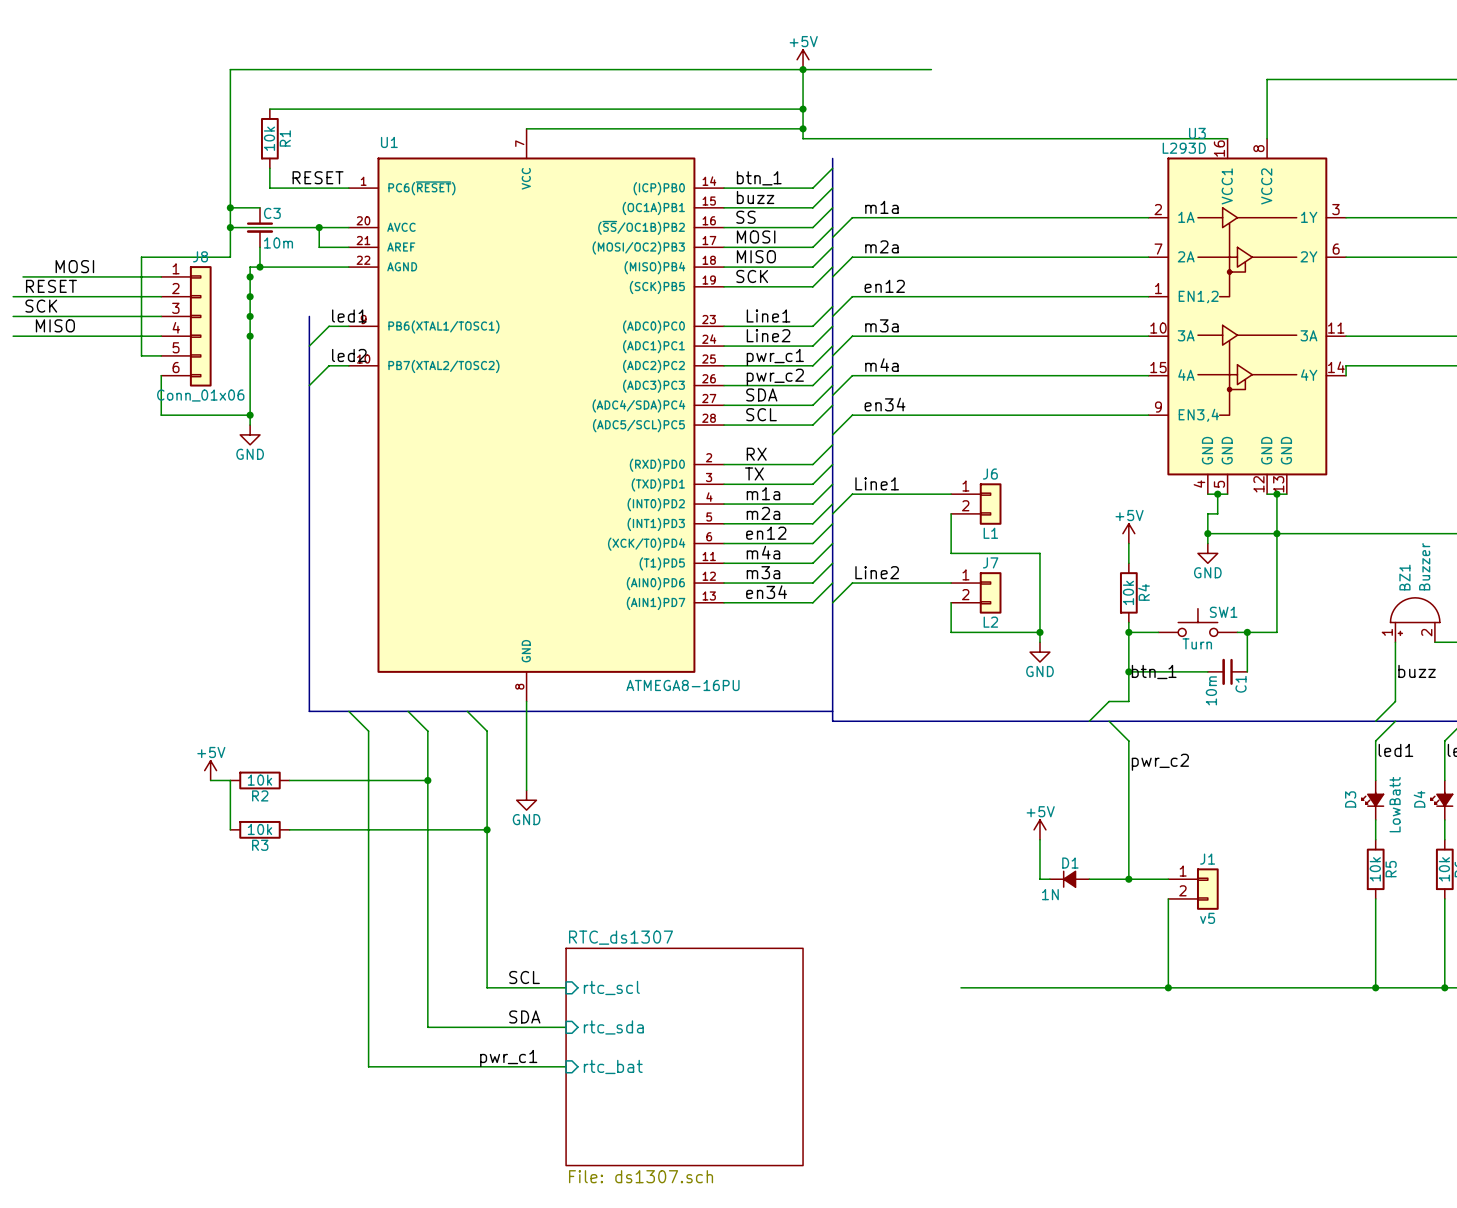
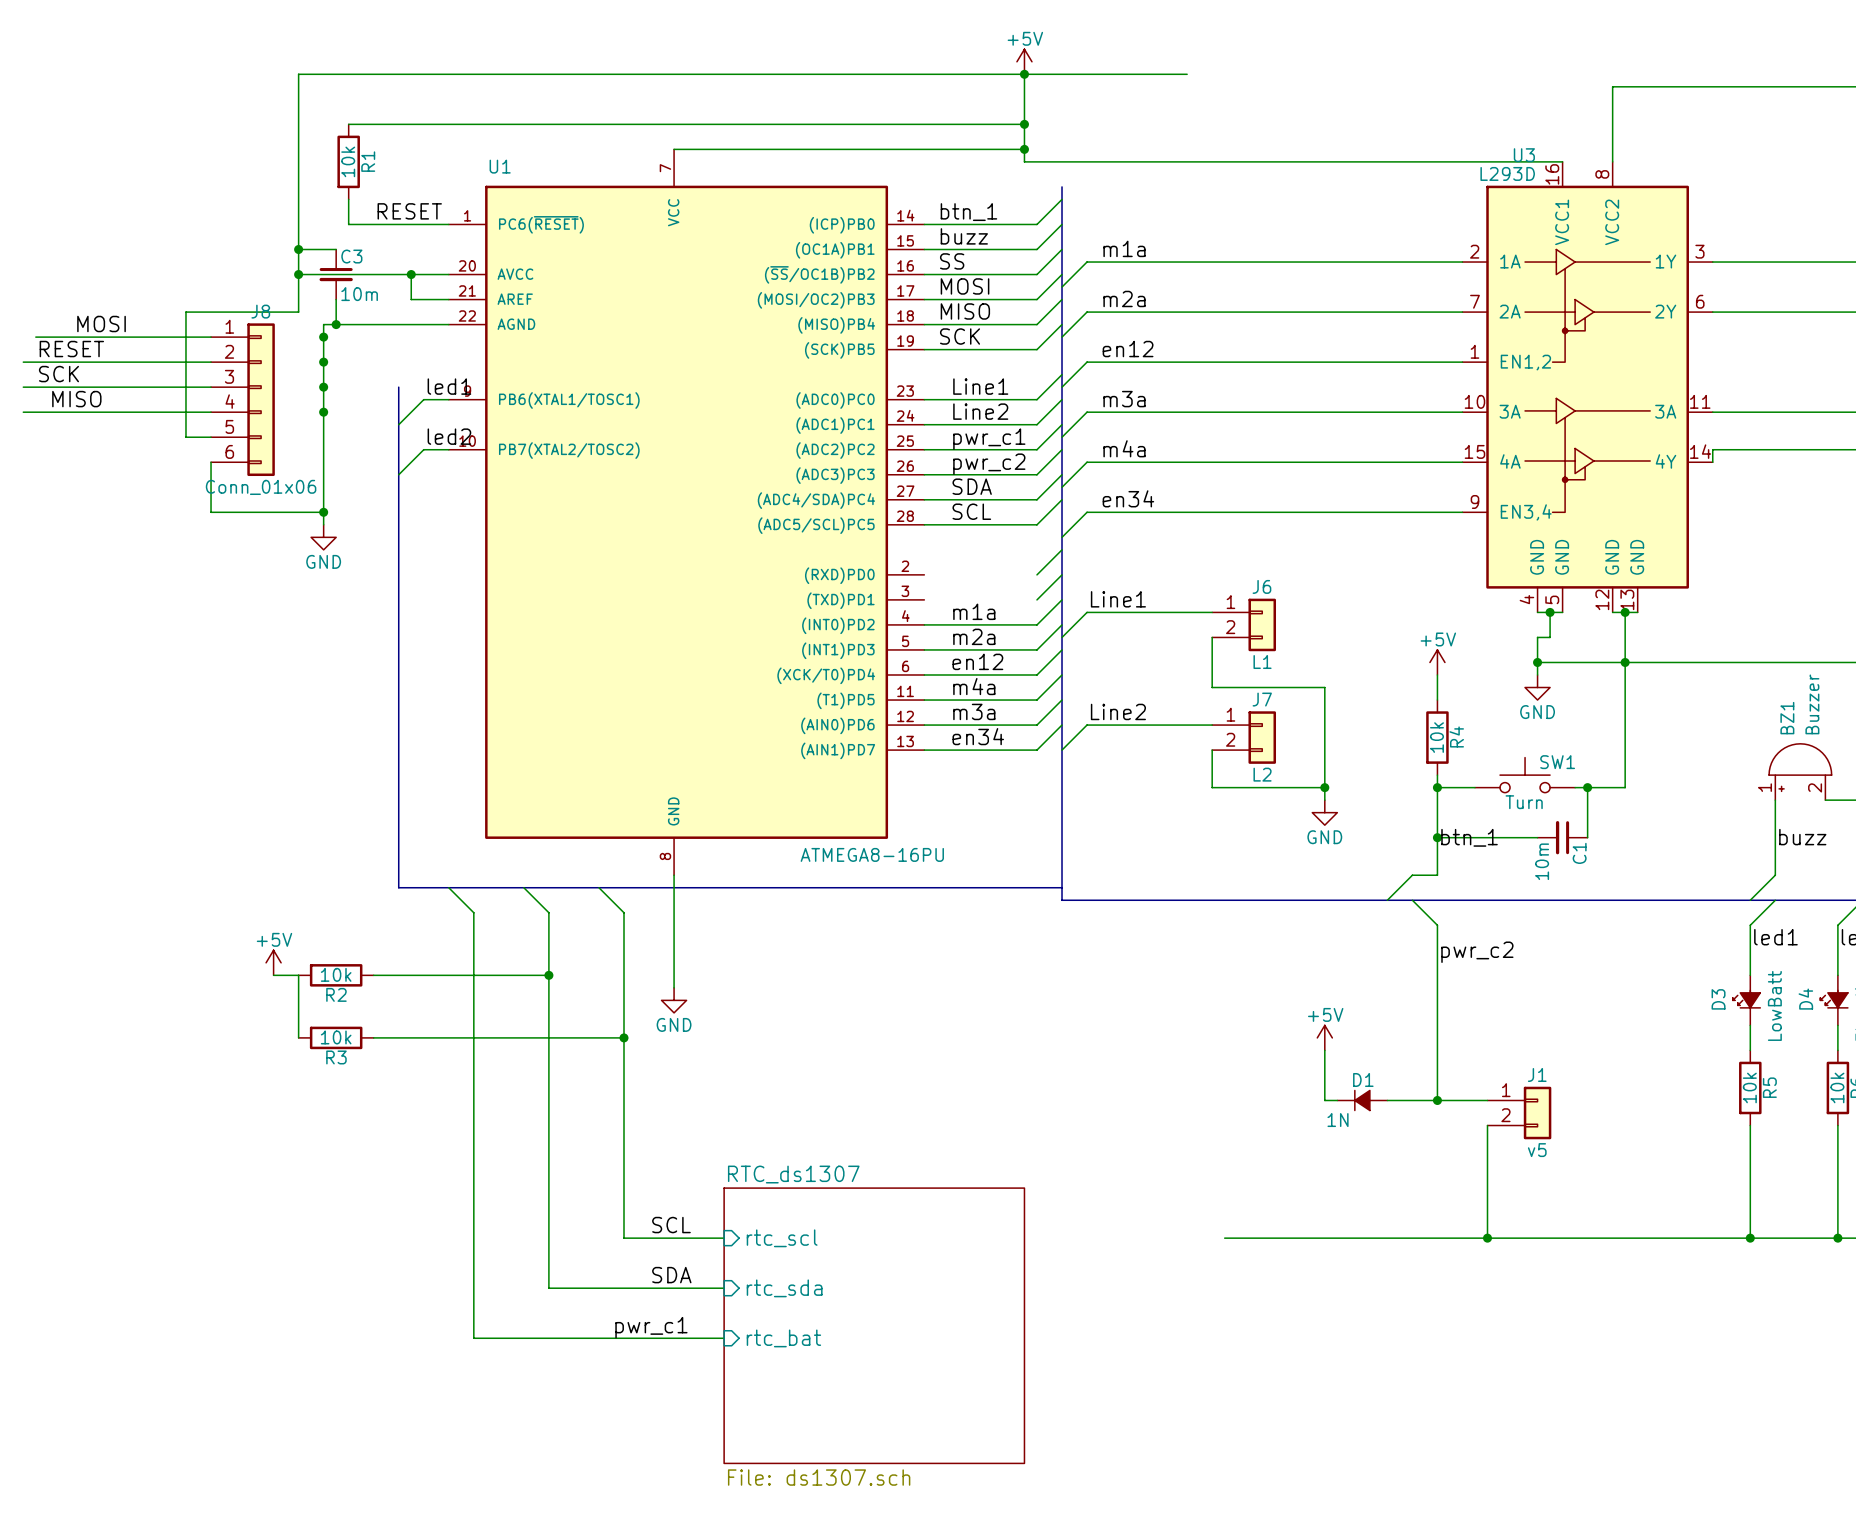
label: RX (756, 454) -> none
wire: (724, 464) (812, 464) -> none
label: TX (754, 473) -> none
wire: (724, 484) (812, 484) -> none

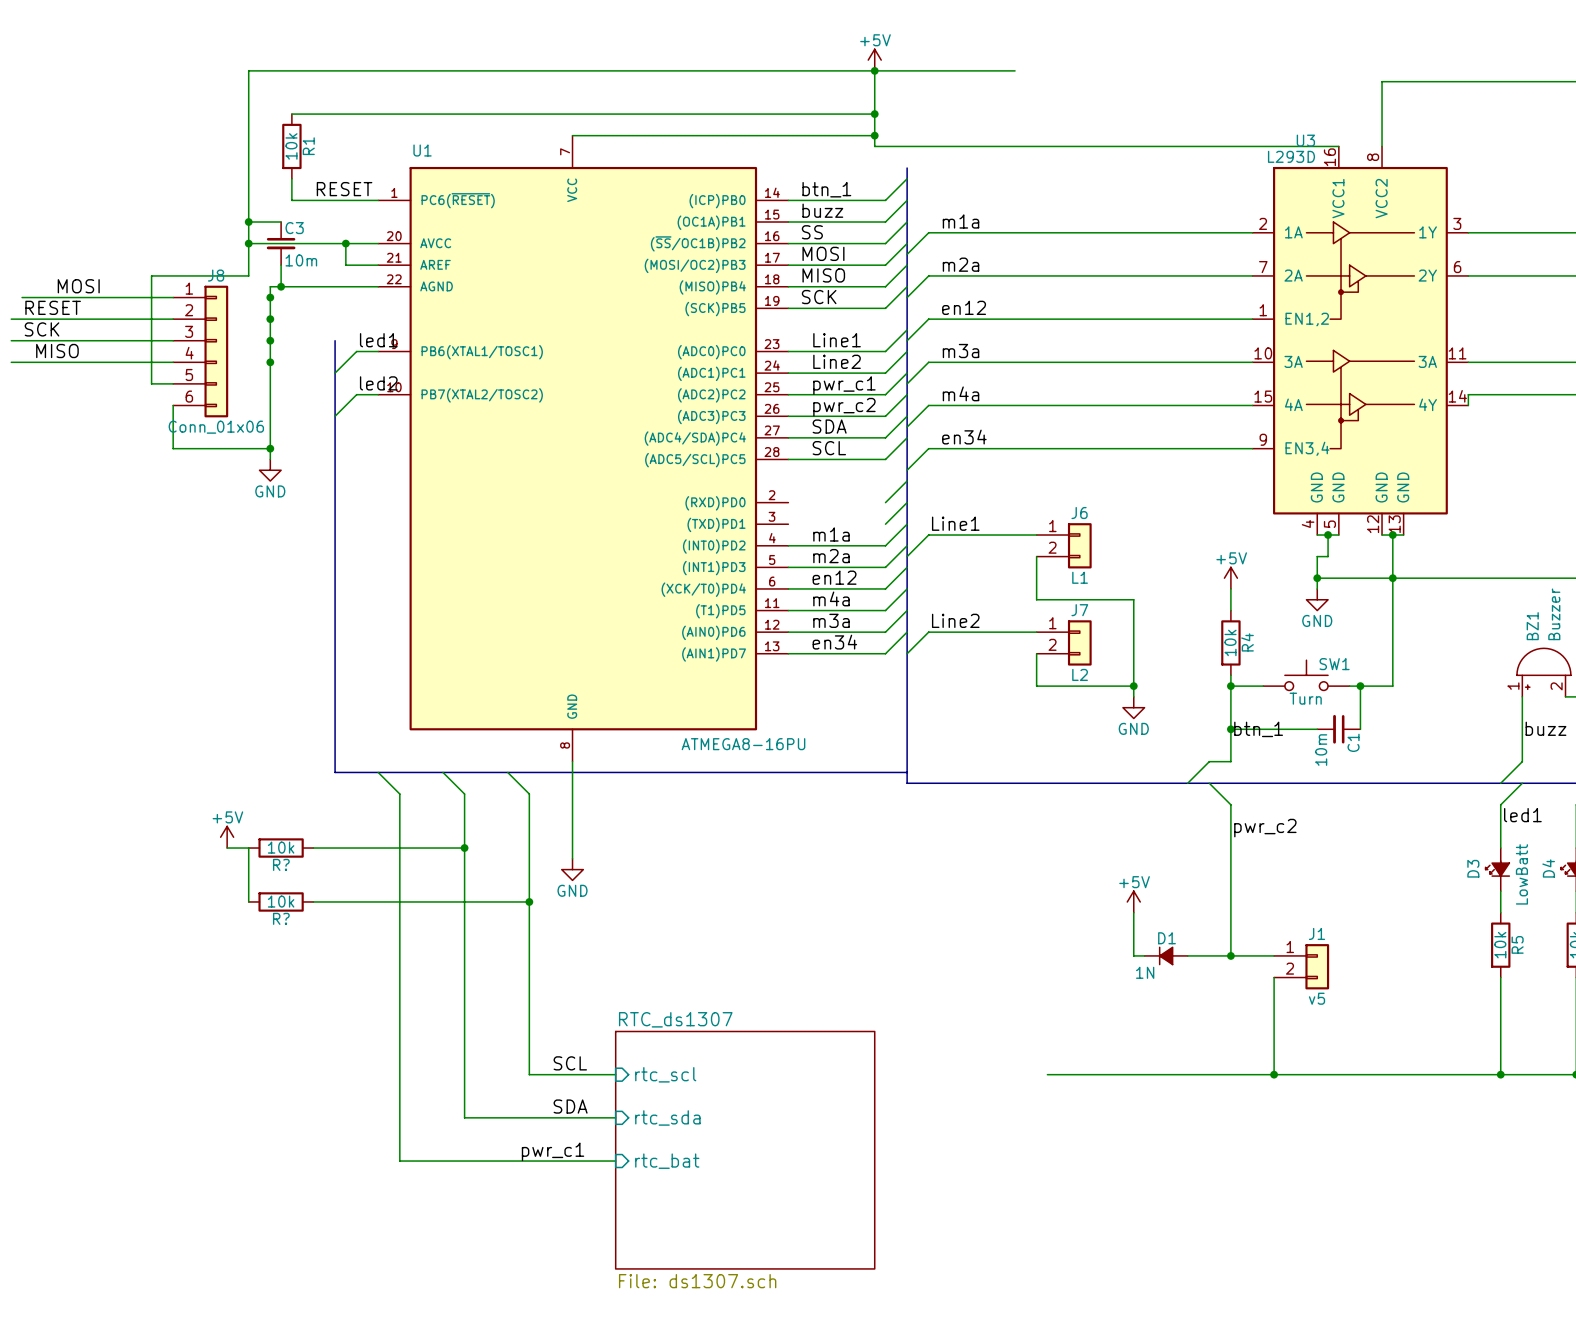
R2 name: R2 (336, 994) -> R? (281, 864)
R3 name: R3 (336, 1057) -> R? (281, 918)

